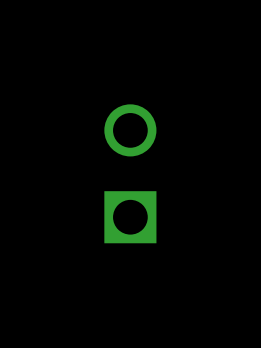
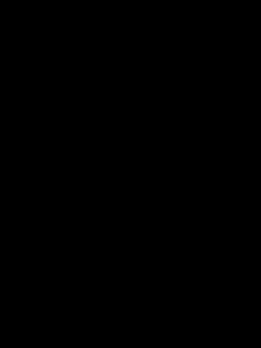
part: (130, 173) -> none

